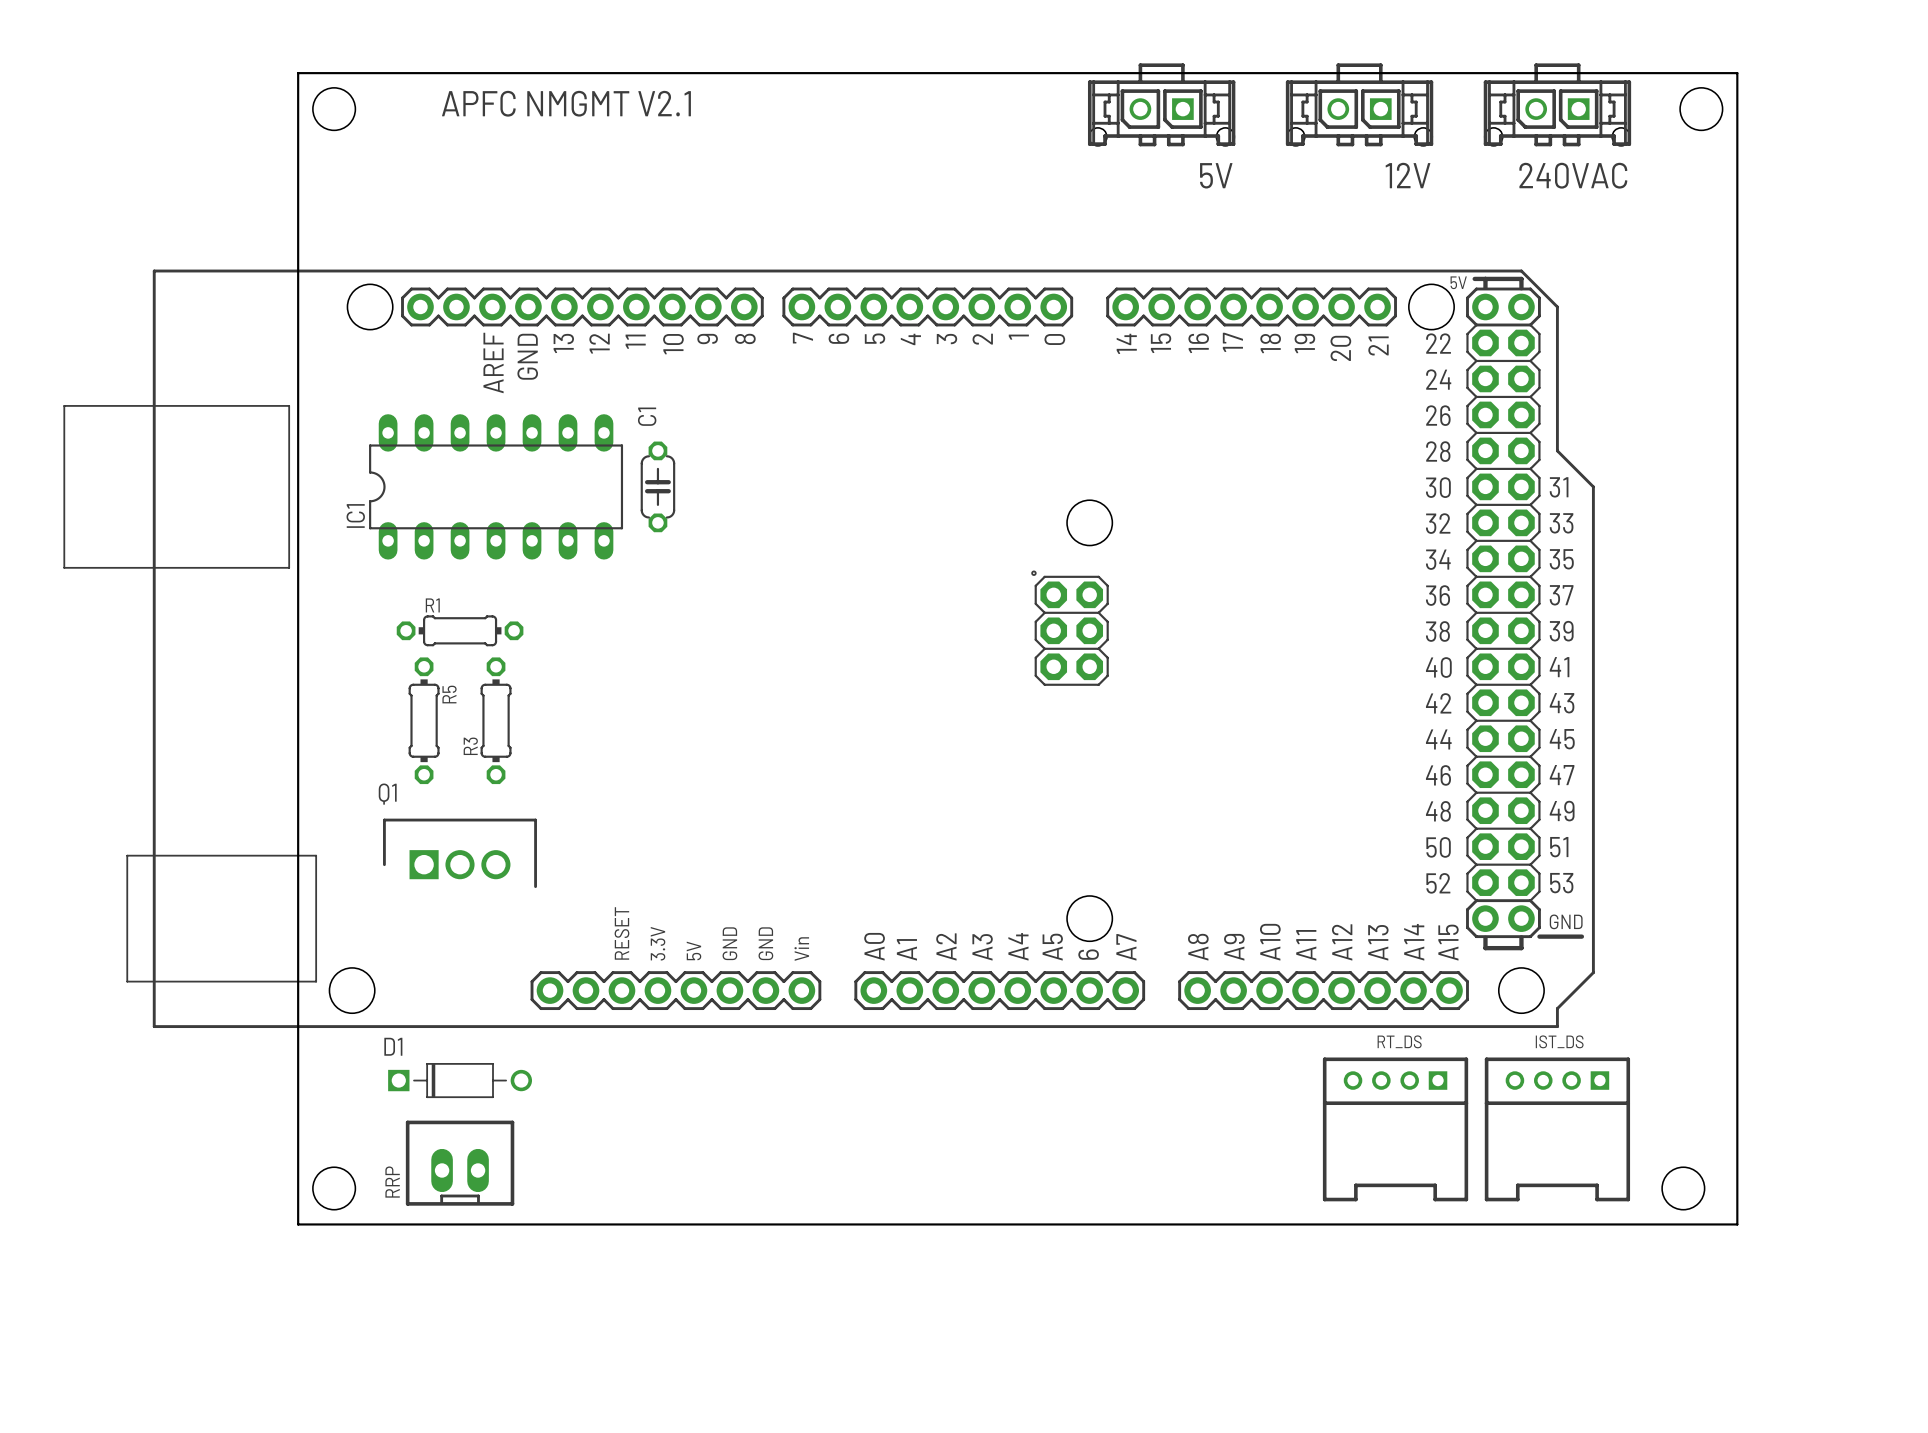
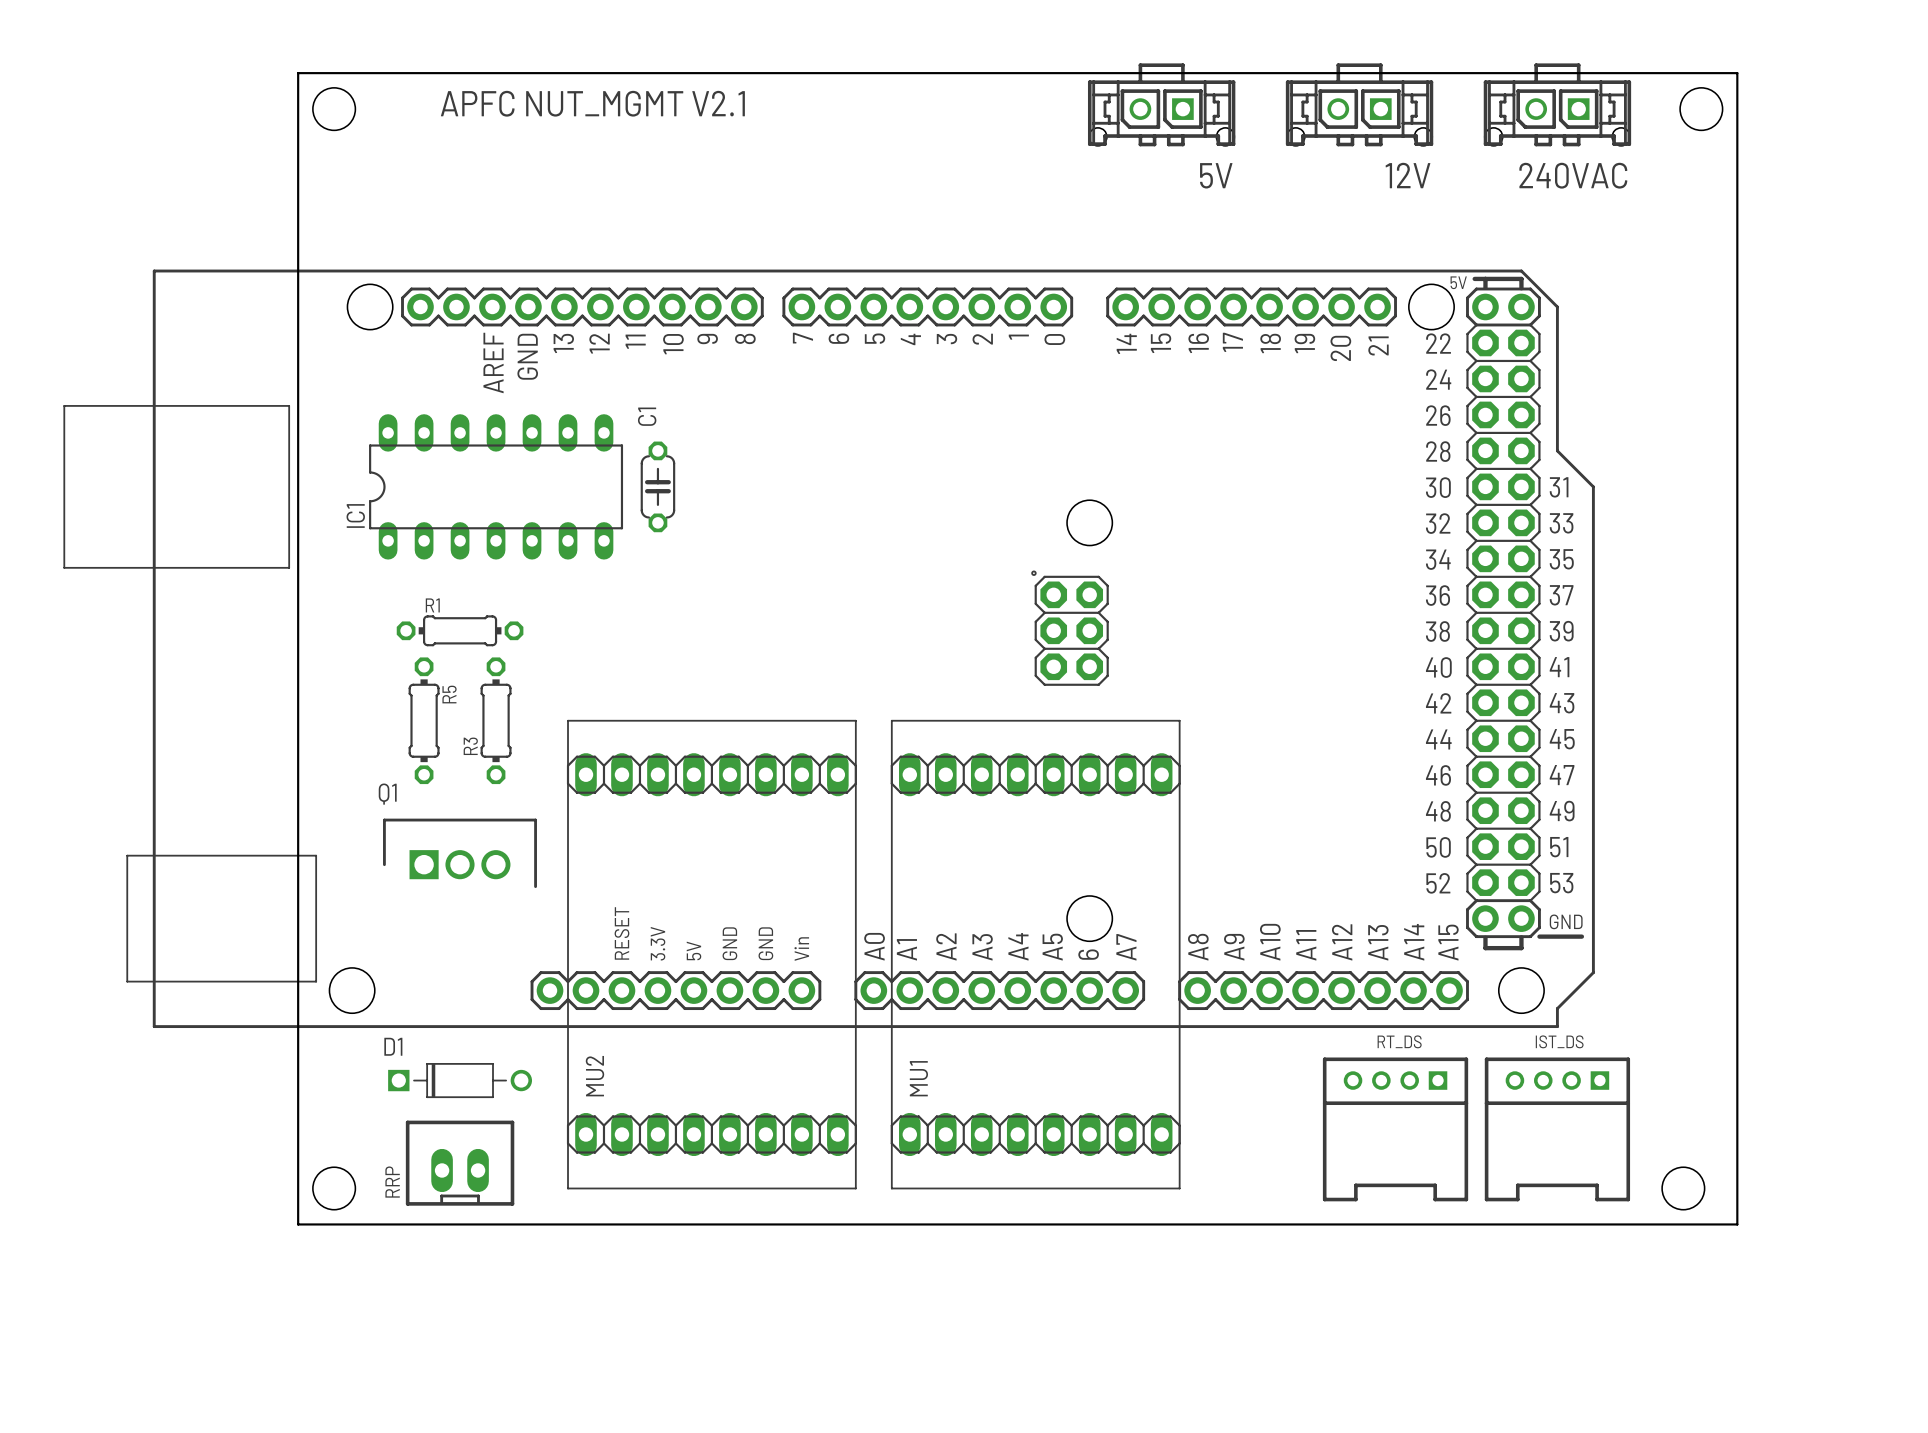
text: APFC NMGMT V2.1 (566, 103) -> APFC NUT_MGMT V2.1 (592, 103)
MU2: none -> (711, 954)
MU1: none -> (1035, 954)

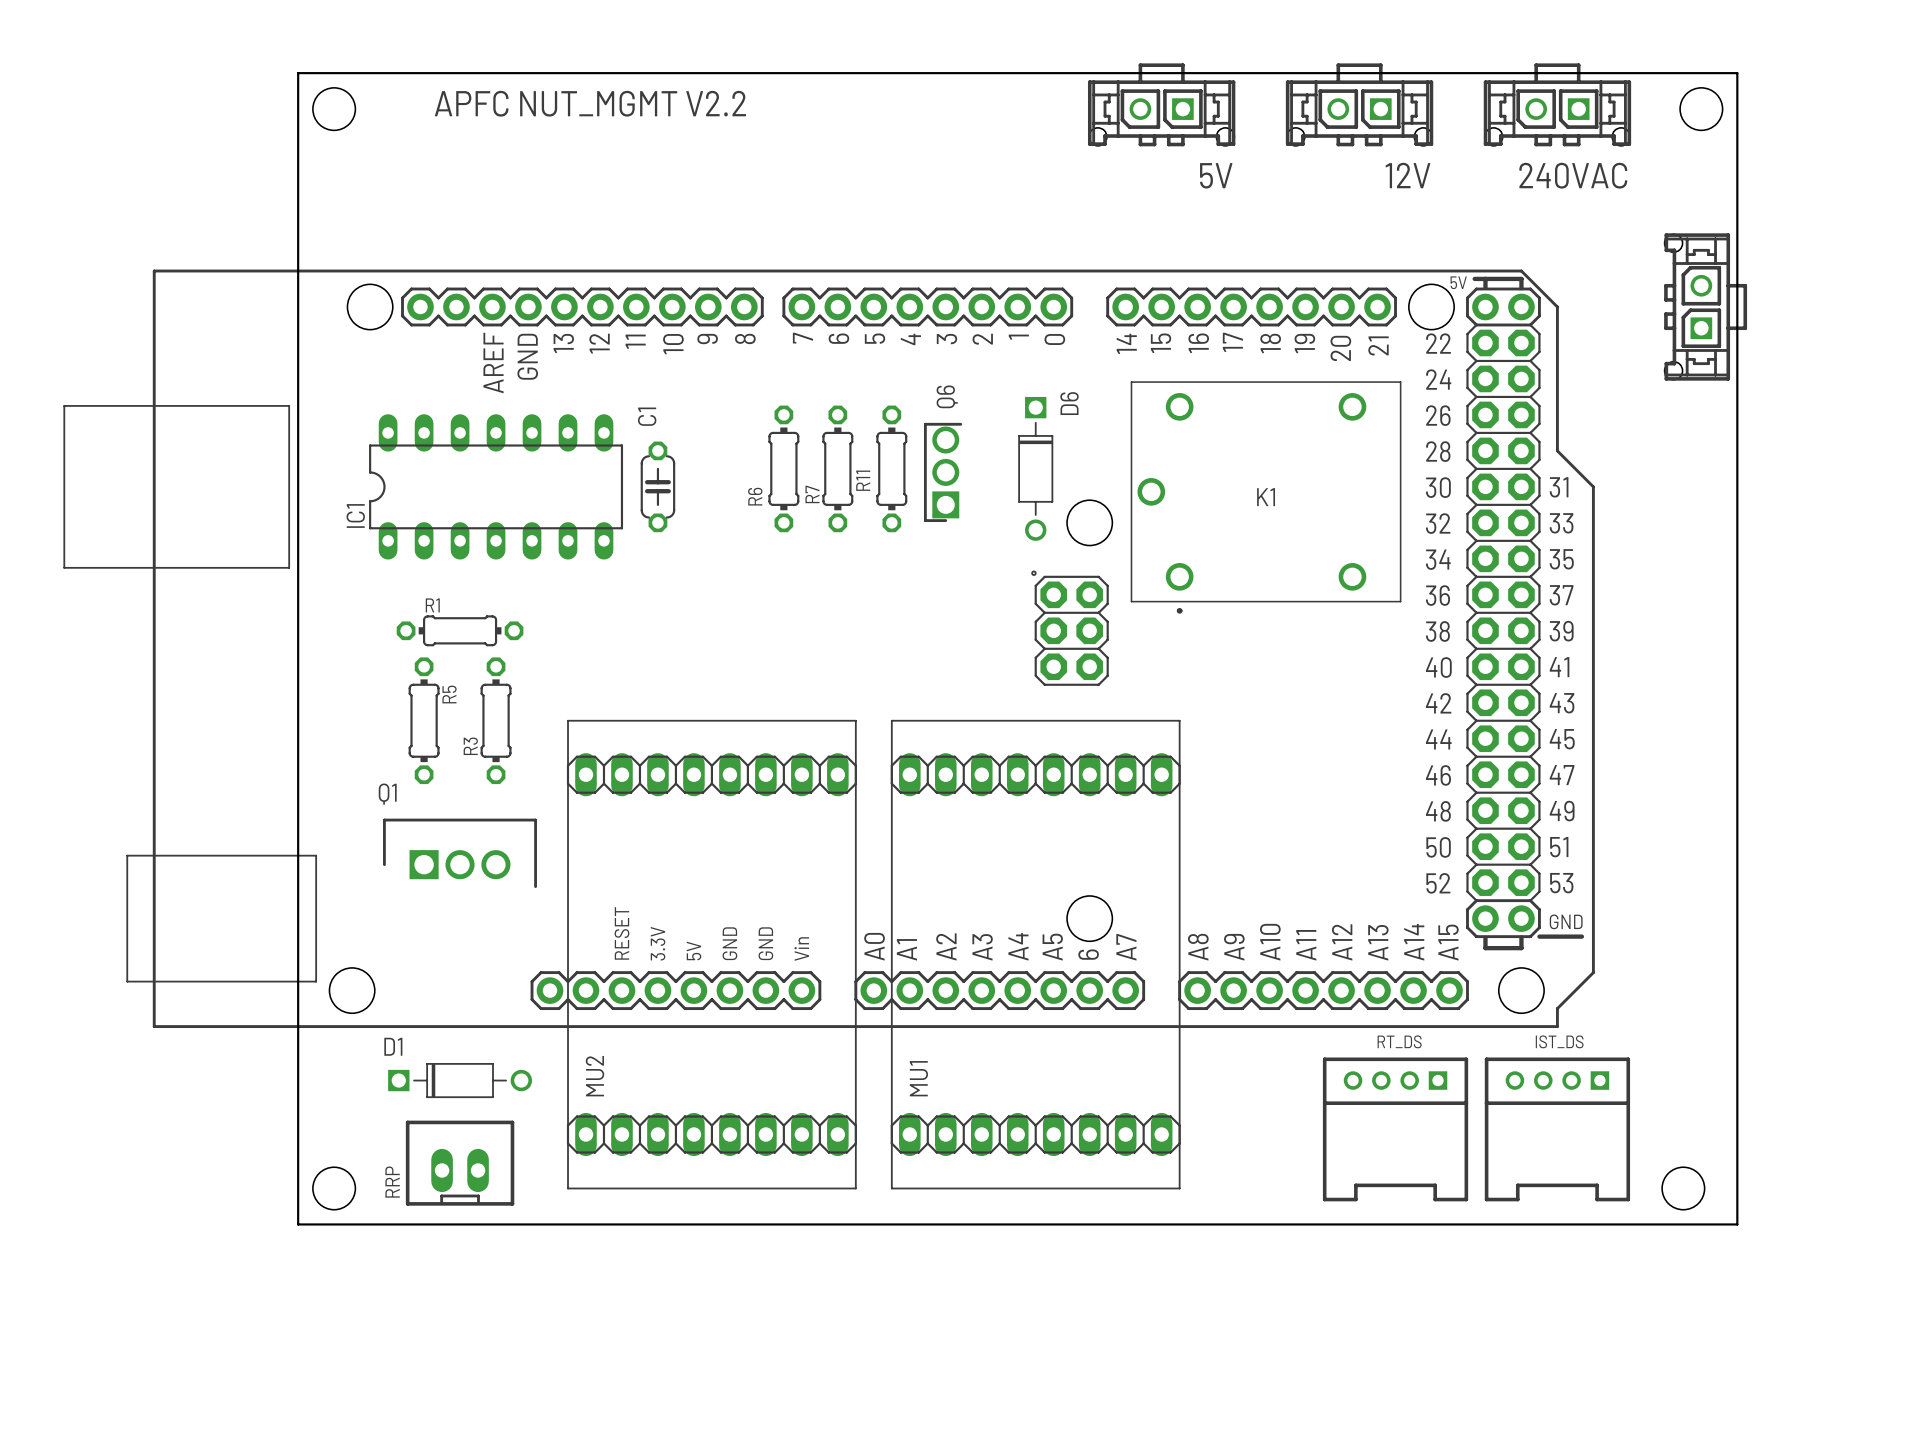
text: APFC NUT_MGMT V2.1 (592, 103) -> APFC NUT_MGMT V2.2 (590, 103)
part: none -> (1705, 306)
R6: none -> (783, 468)
R7: none -> (837, 468)
R11: none -> (891, 468)
D6: none -> (1035, 468)
Q6: none -> (943, 472)
K1: none -> (1266, 497)

